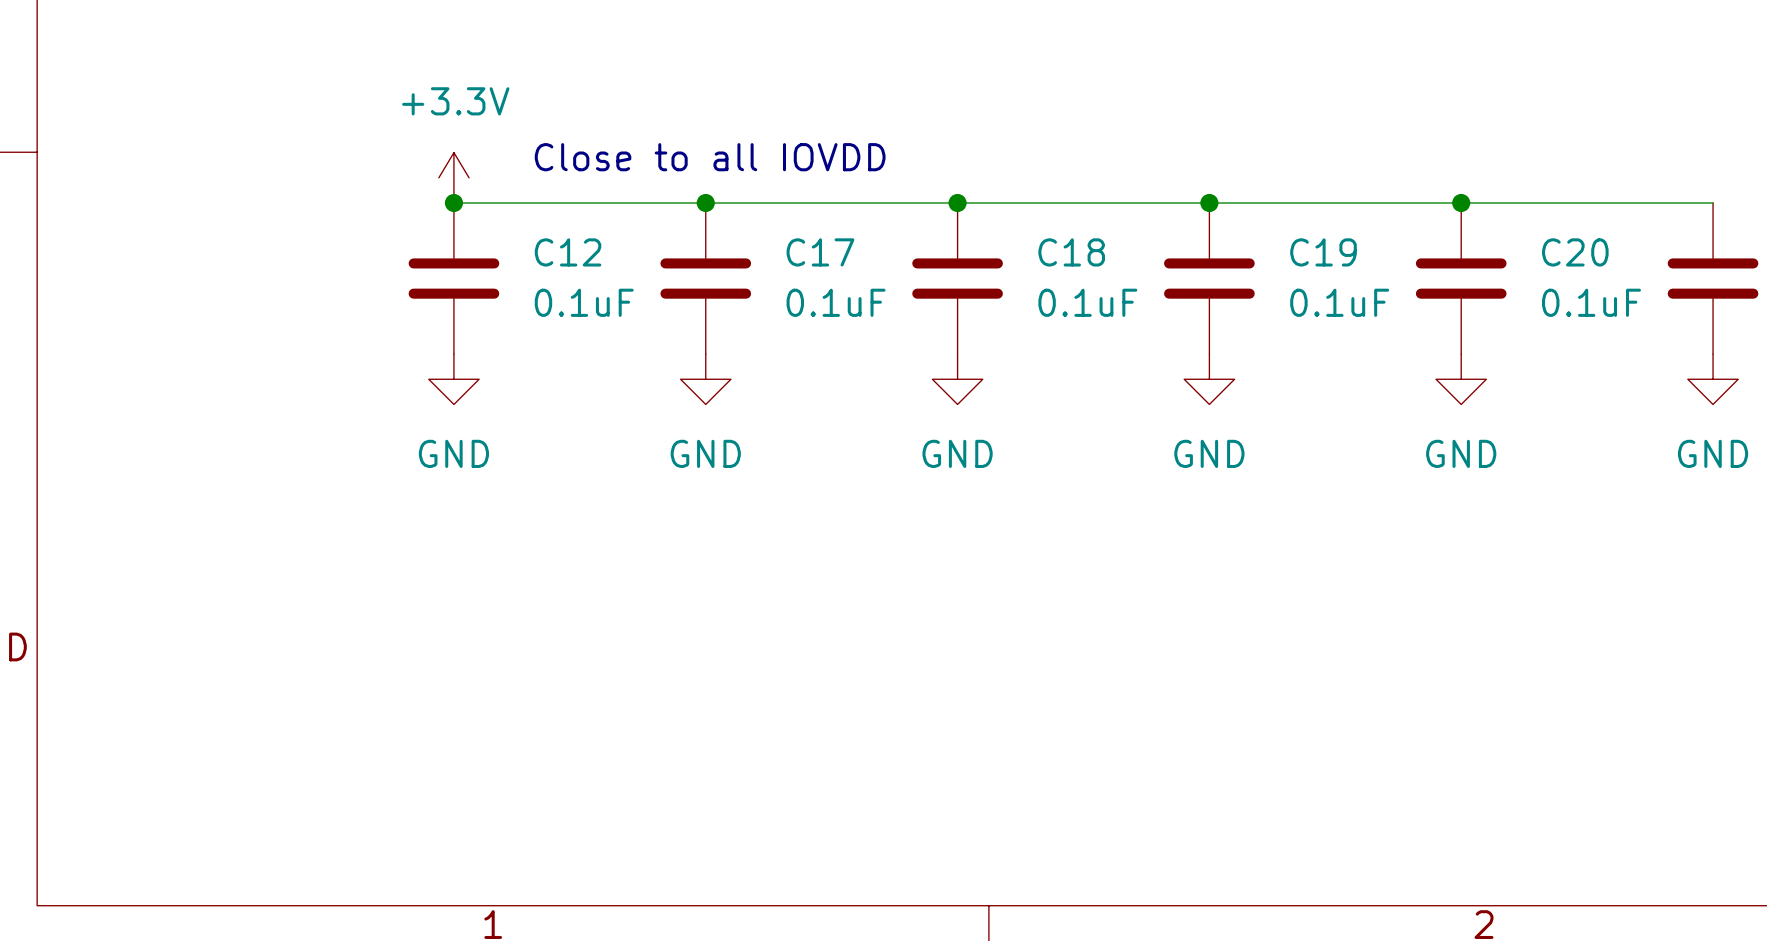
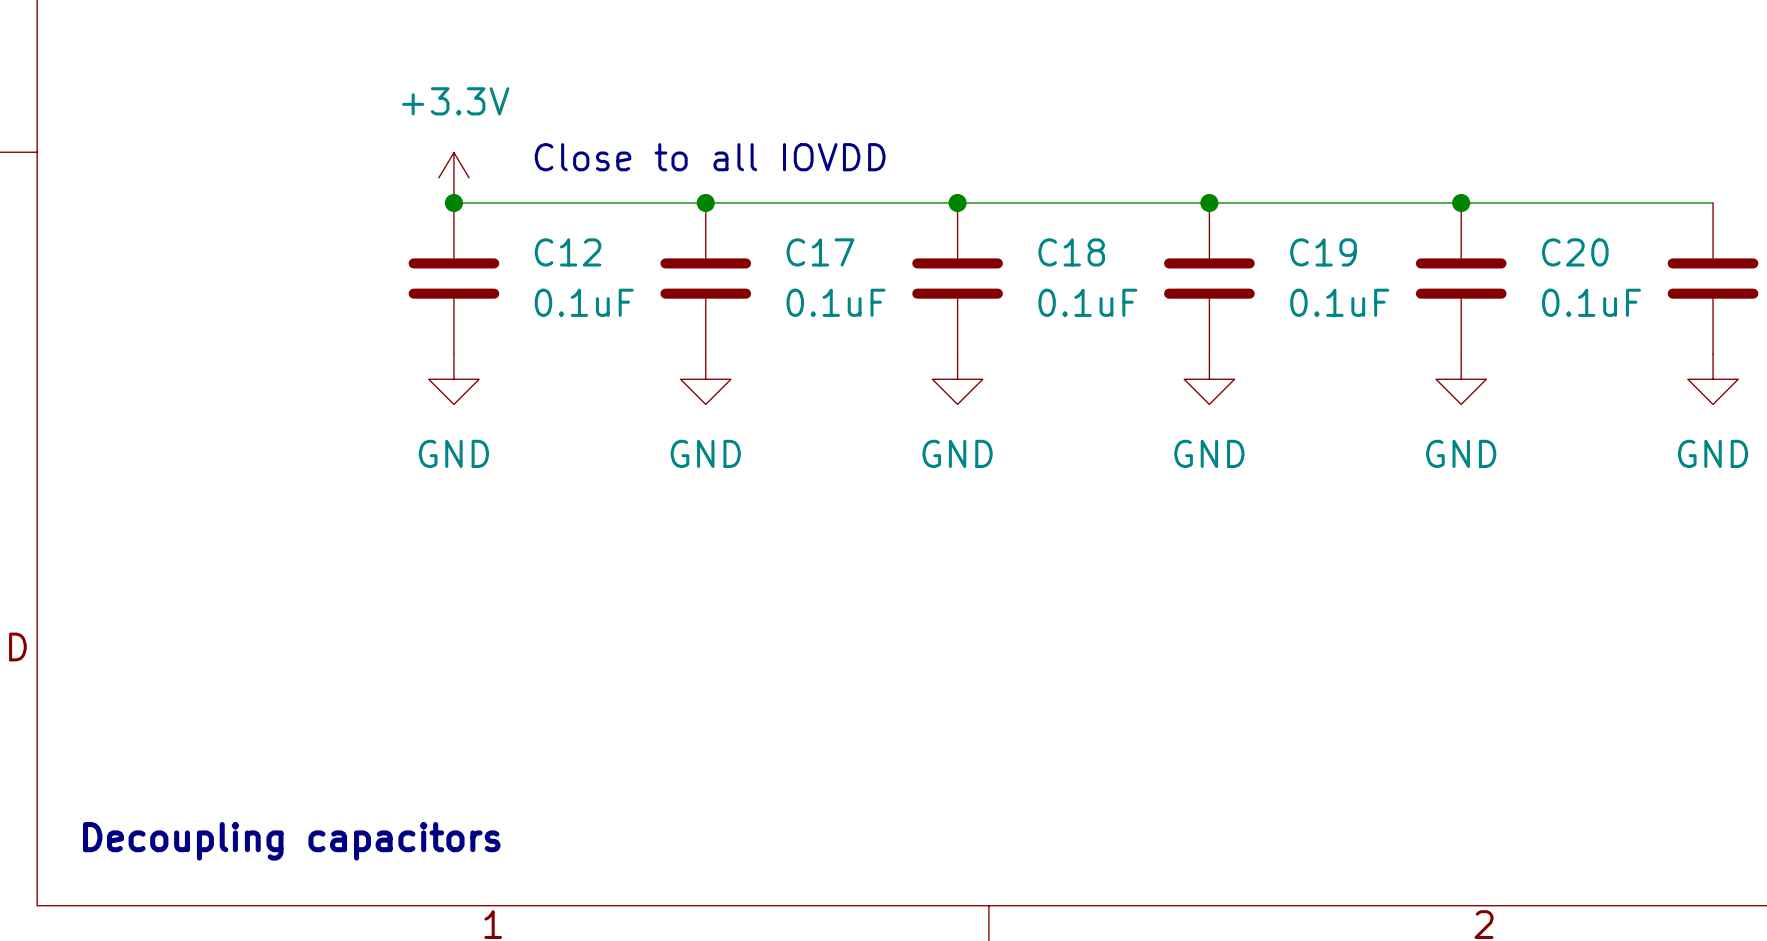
text: none -> Decoupling capacitors (291, 841)

